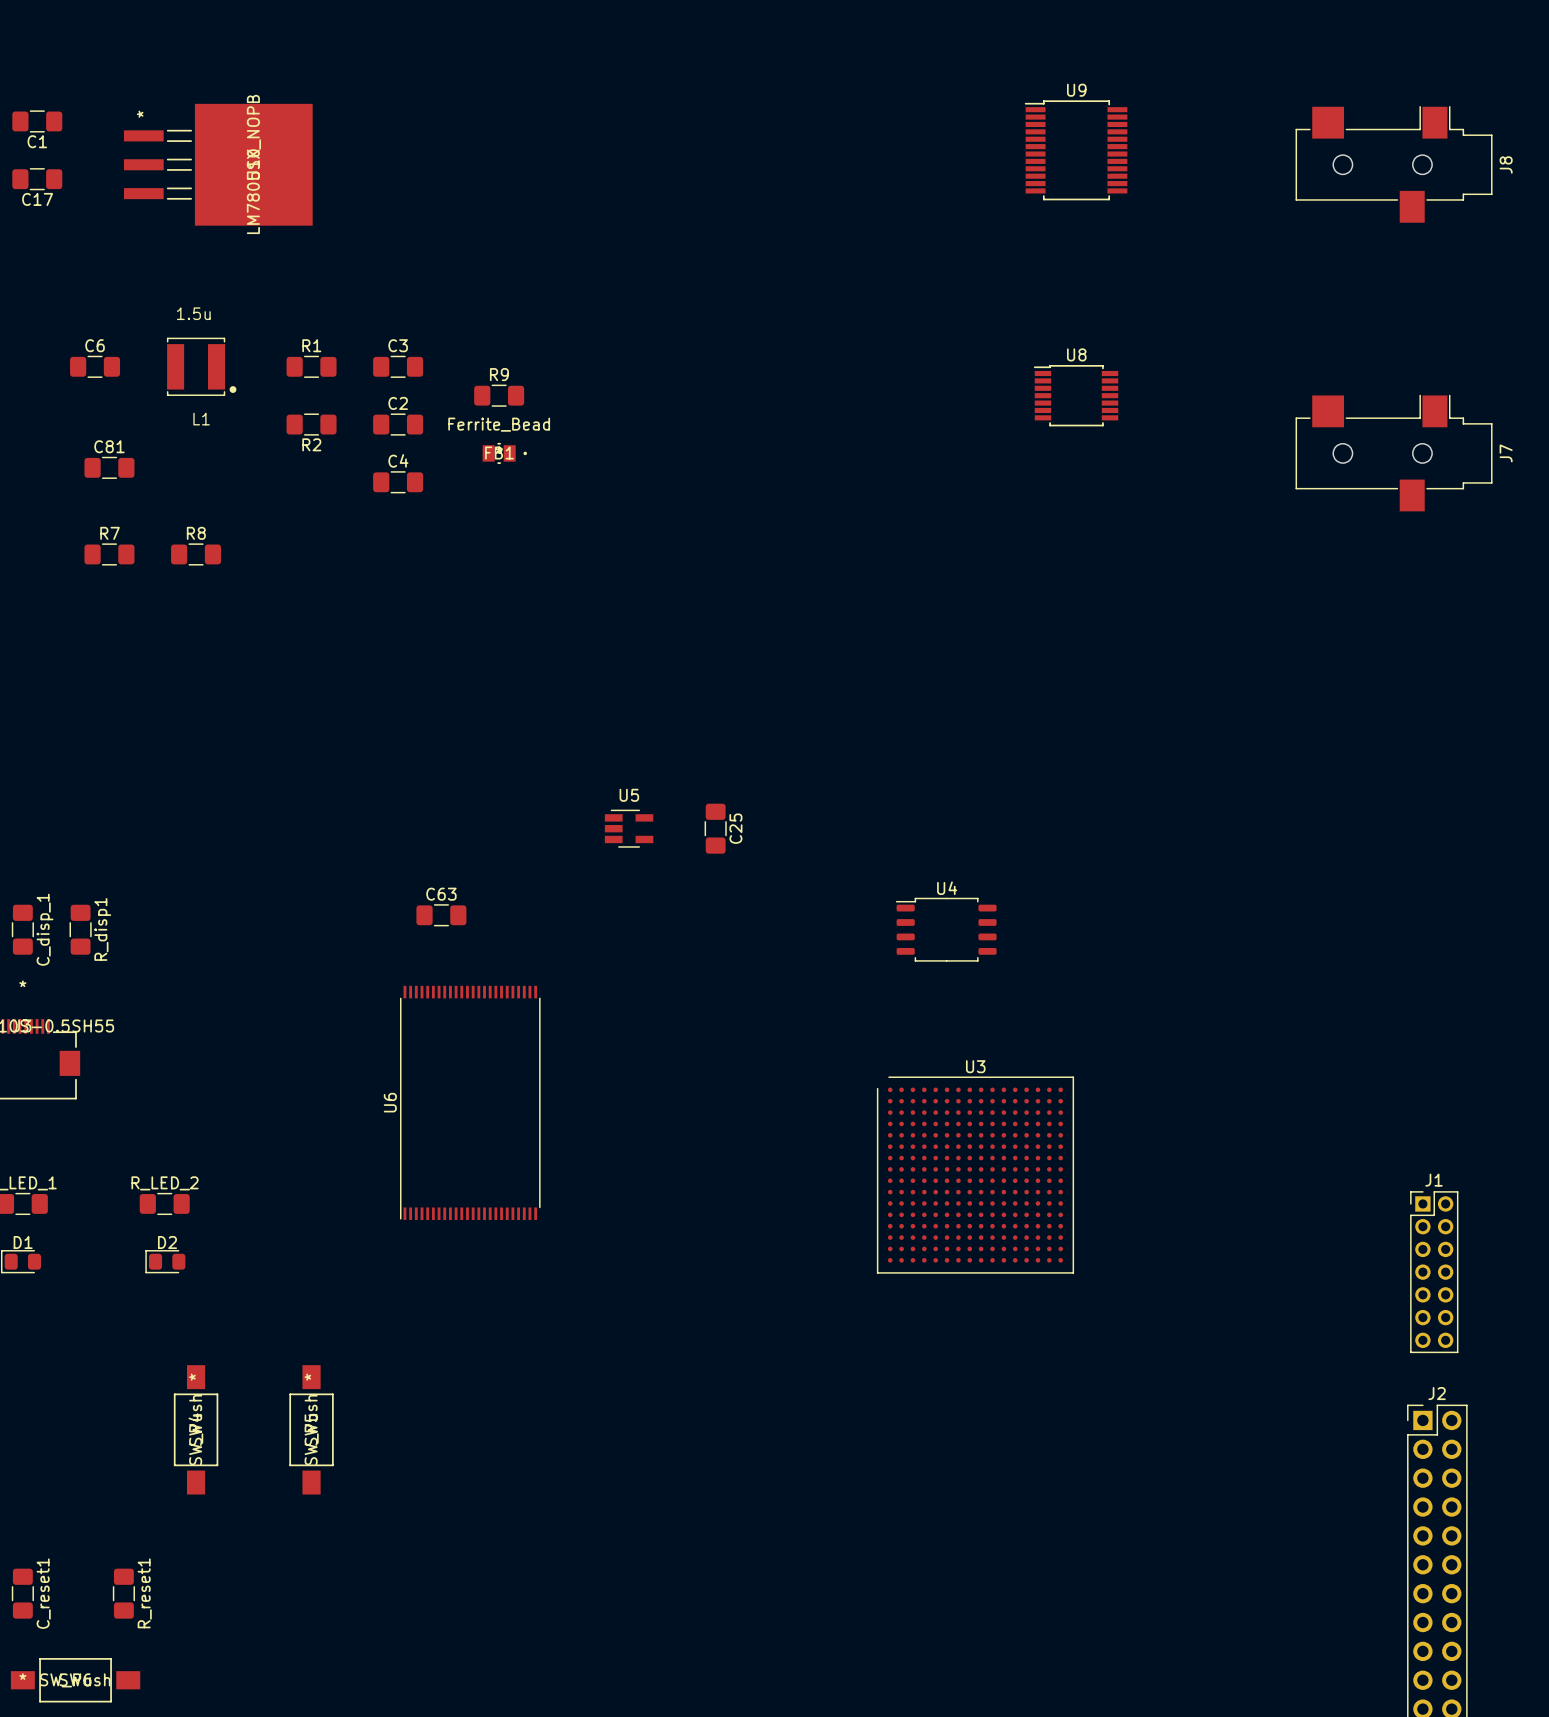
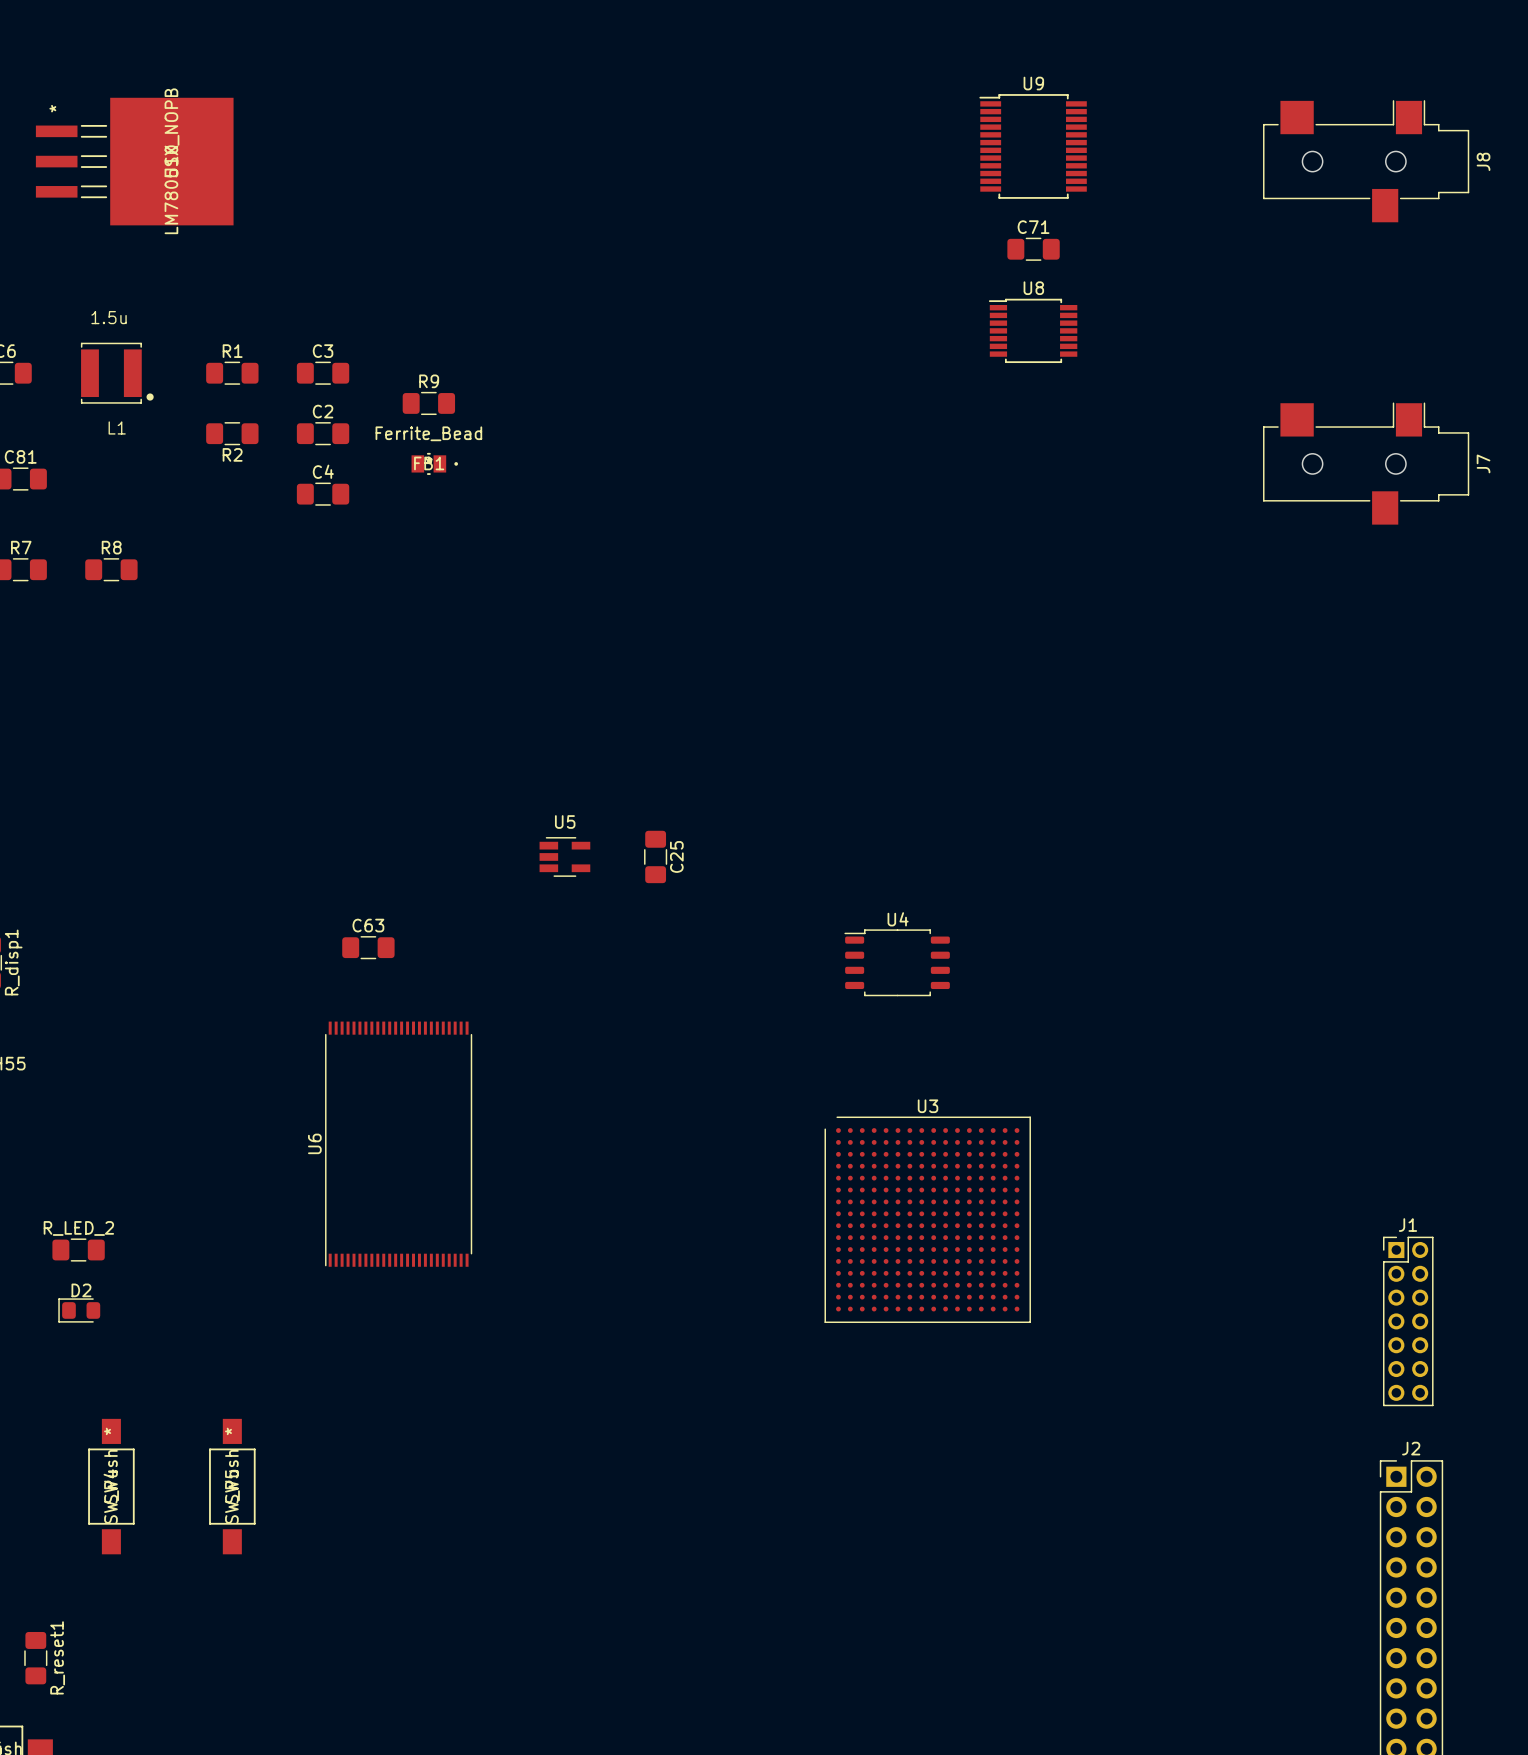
C71: none -> (1033, 249)
U8 position: (1076, 395) -> (1033, 330)

